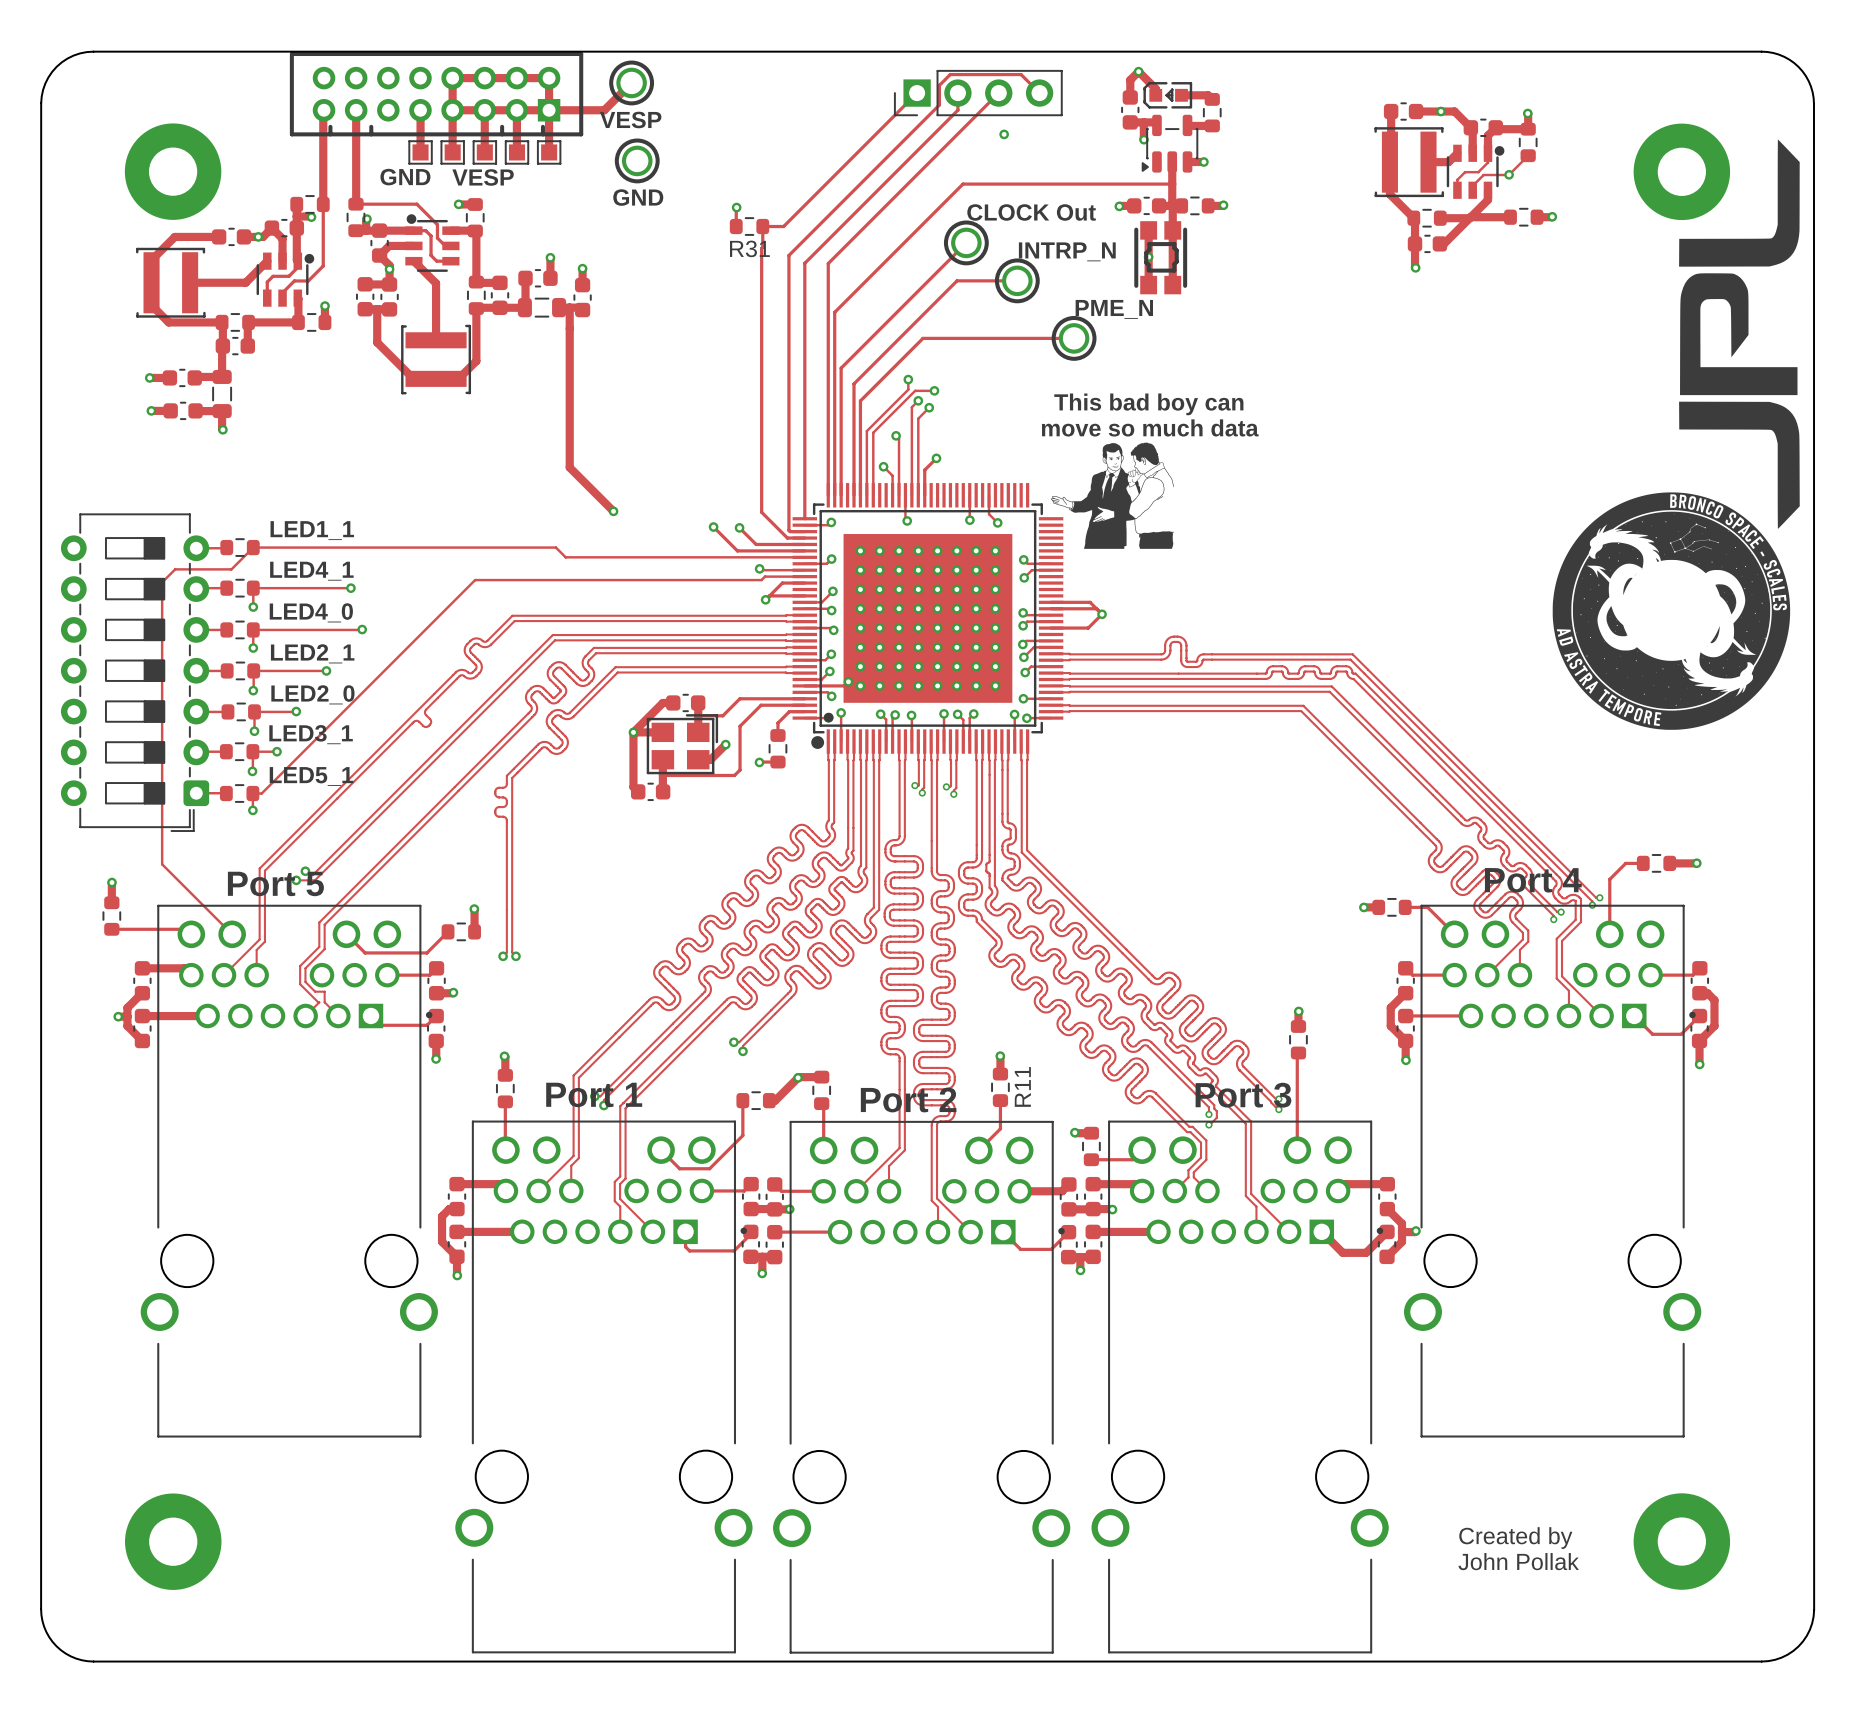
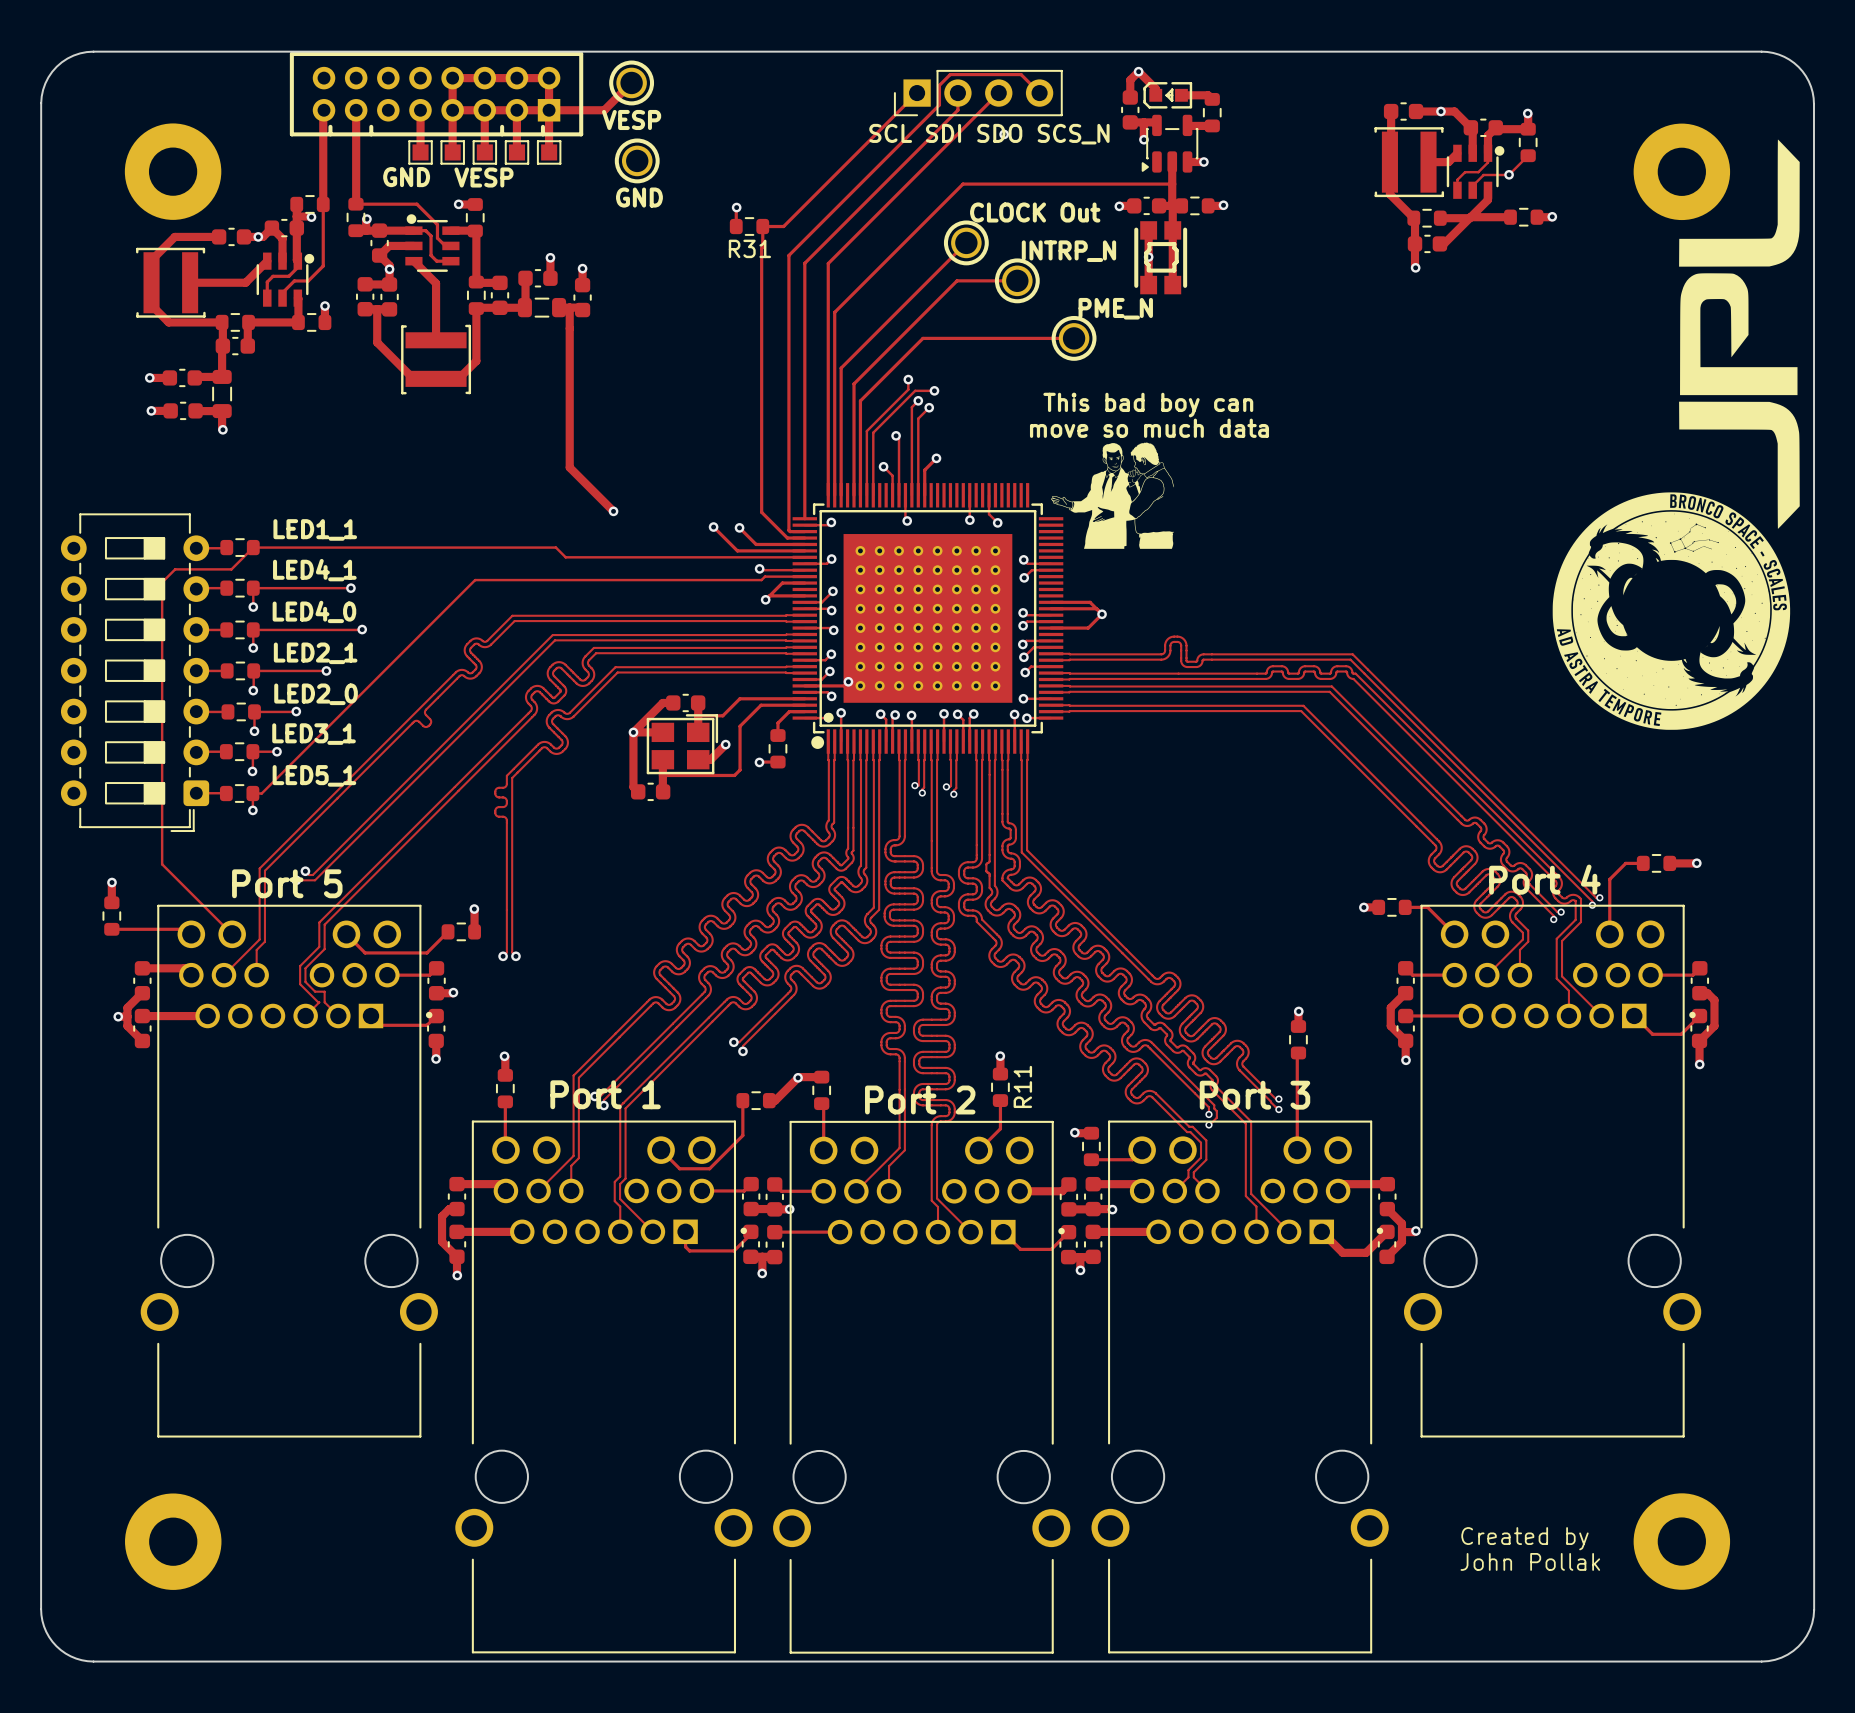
text: none -> SCL SDI SDO SCS_N (989, 134)

